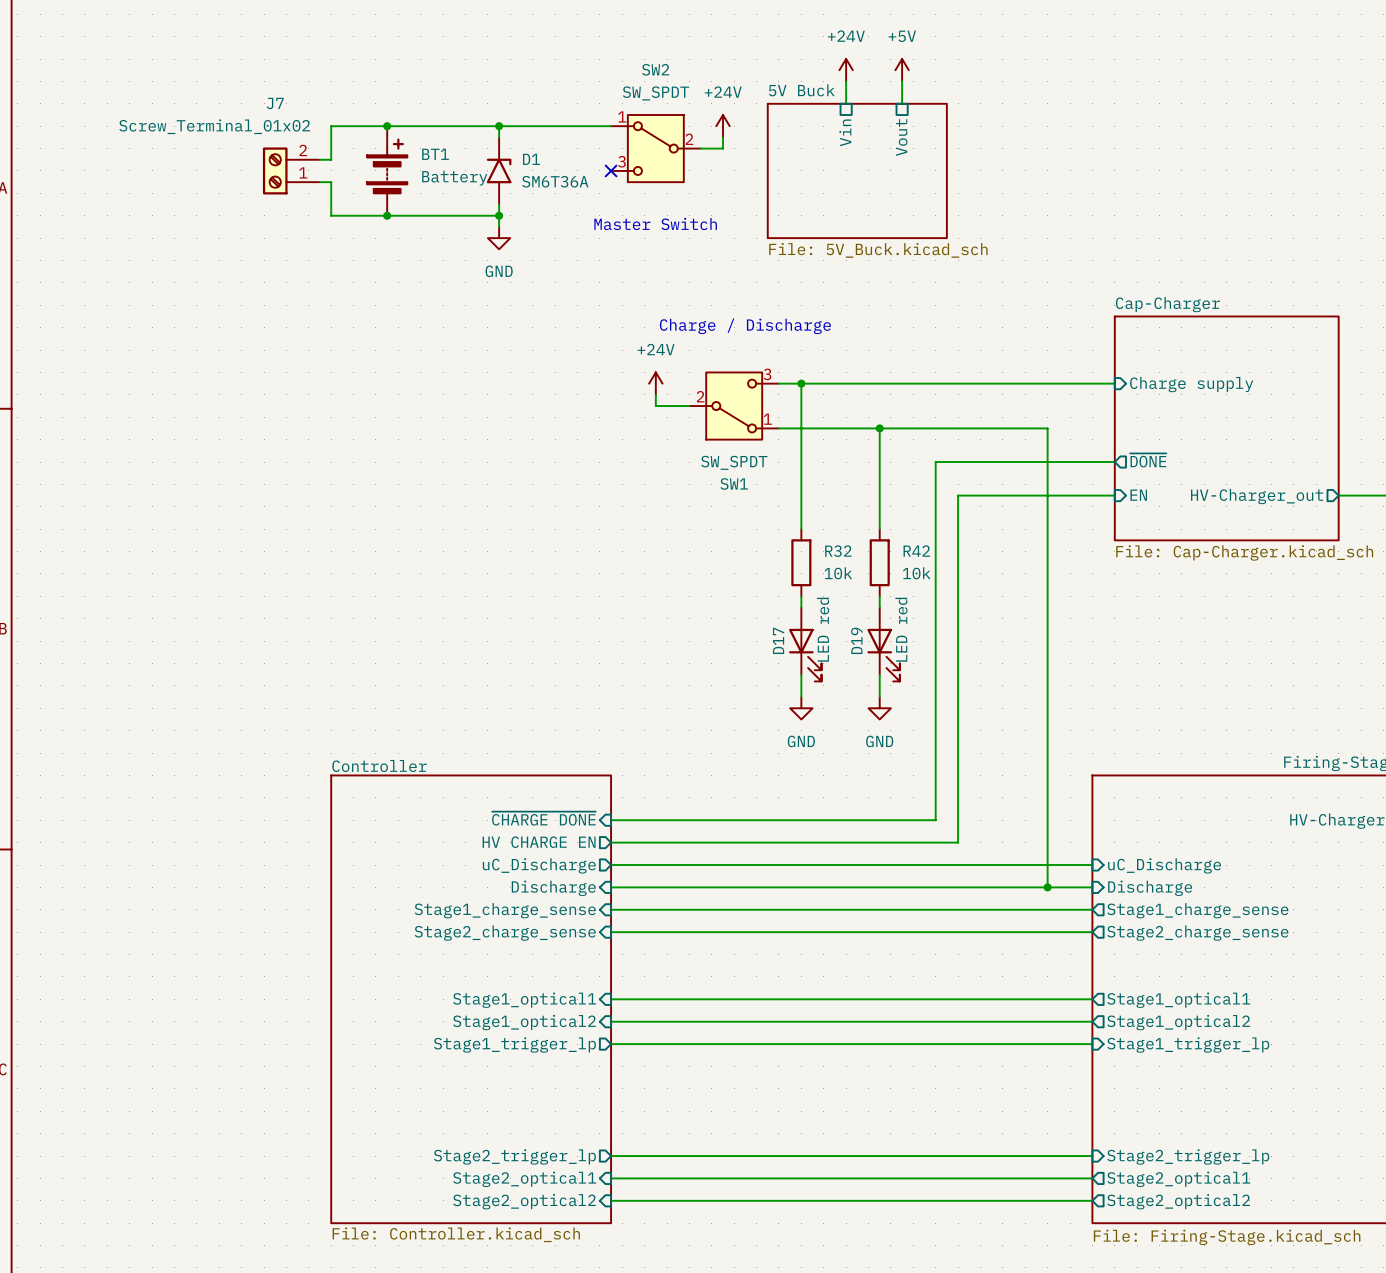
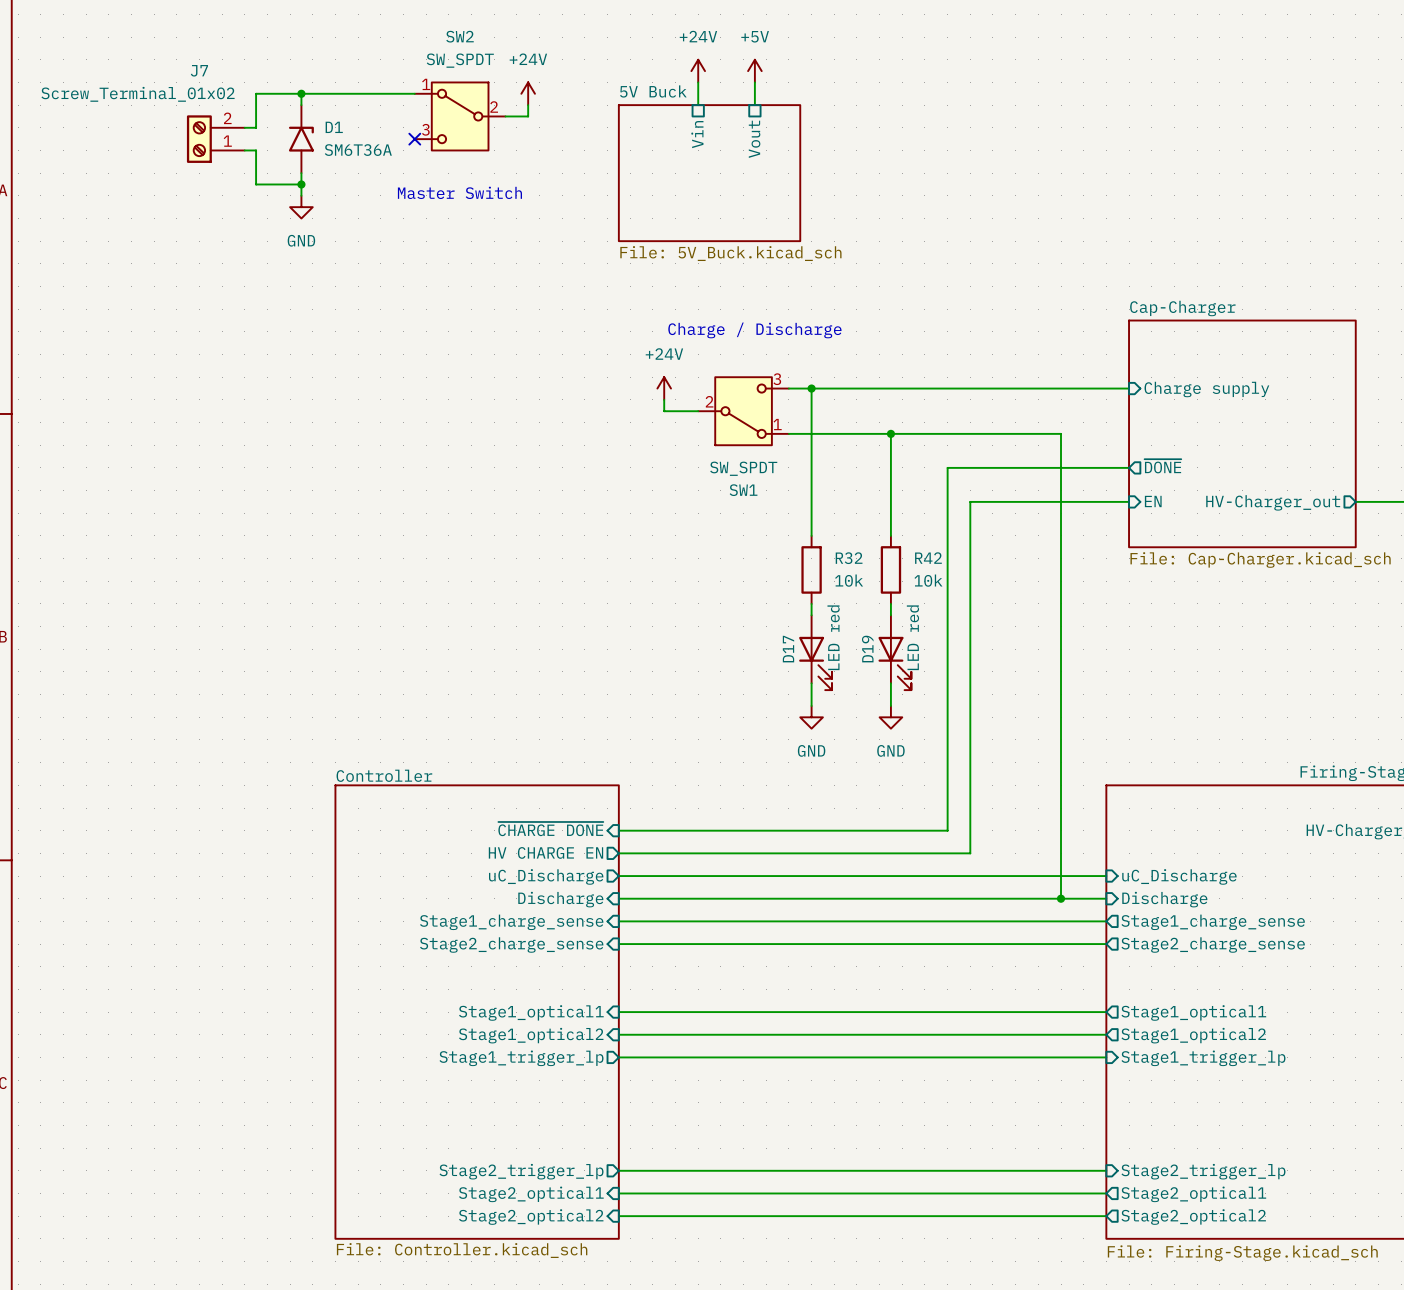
power symbol: +24V (846, 70) -> none
power symbol position: +5V (902, 70) -> +5V (754, 71)
wire: (846, 81) (846, 103) -> (698, 82) (698, 105)
wire: (902, 81) (902, 103) -> (754, 82) (754, 105)
junction: none -> (301, 93)
wire: none -> (414, 93) (256, 93) (256, 127) (244, 127)
power symbol: none -> +24V (528, 93)
junction: (387, 126) -> none
wire: (499, 126) (499, 137) -> (301, 93) (301, 105)
junction: (499, 126) -> none
wire: (611, 126) (331, 126) (331, 159) (320, 159) -> none
power symbol position: +24V (723, 126) -> +24V (698, 71)
sheet pin position: Vin (845, 132) -> Vin (697, 134)
no-connect mark: none -> (414, 139)
wire: (723, 137) (723, 148) (700, 148) -> (528, 105) (528, 116) (505, 116)
sheet pin position: Vout (901, 137) -> Vout (754, 139)
wire: none -> (244, 150) (256, 150) (256, 184) (301, 184)
SW2 position: (655, 148) -> (460, 116)
J7 position: (291, 170) -> (215, 139)
BT1: Battery (387, 170) -> none
D1 position: (499, 170) -> (301, 139)
no-connect mark: (611, 170) -> none
sheet 5V Buck position: (857, 170) -> (709, 173)
junction: none -> (301, 184)
wire: (320, 182) (331, 182) (331, 215) (499, 215) -> none
wire: (499, 204) (499, 226) -> (301, 173) (301, 195)
junction: (387, 215) -> none
junction: (499, 215) -> none
text position: Master Switch (655, 224) -> Master Switch (459, 192)
power symbol position: GND (499, 238) -> GND (301, 207)

